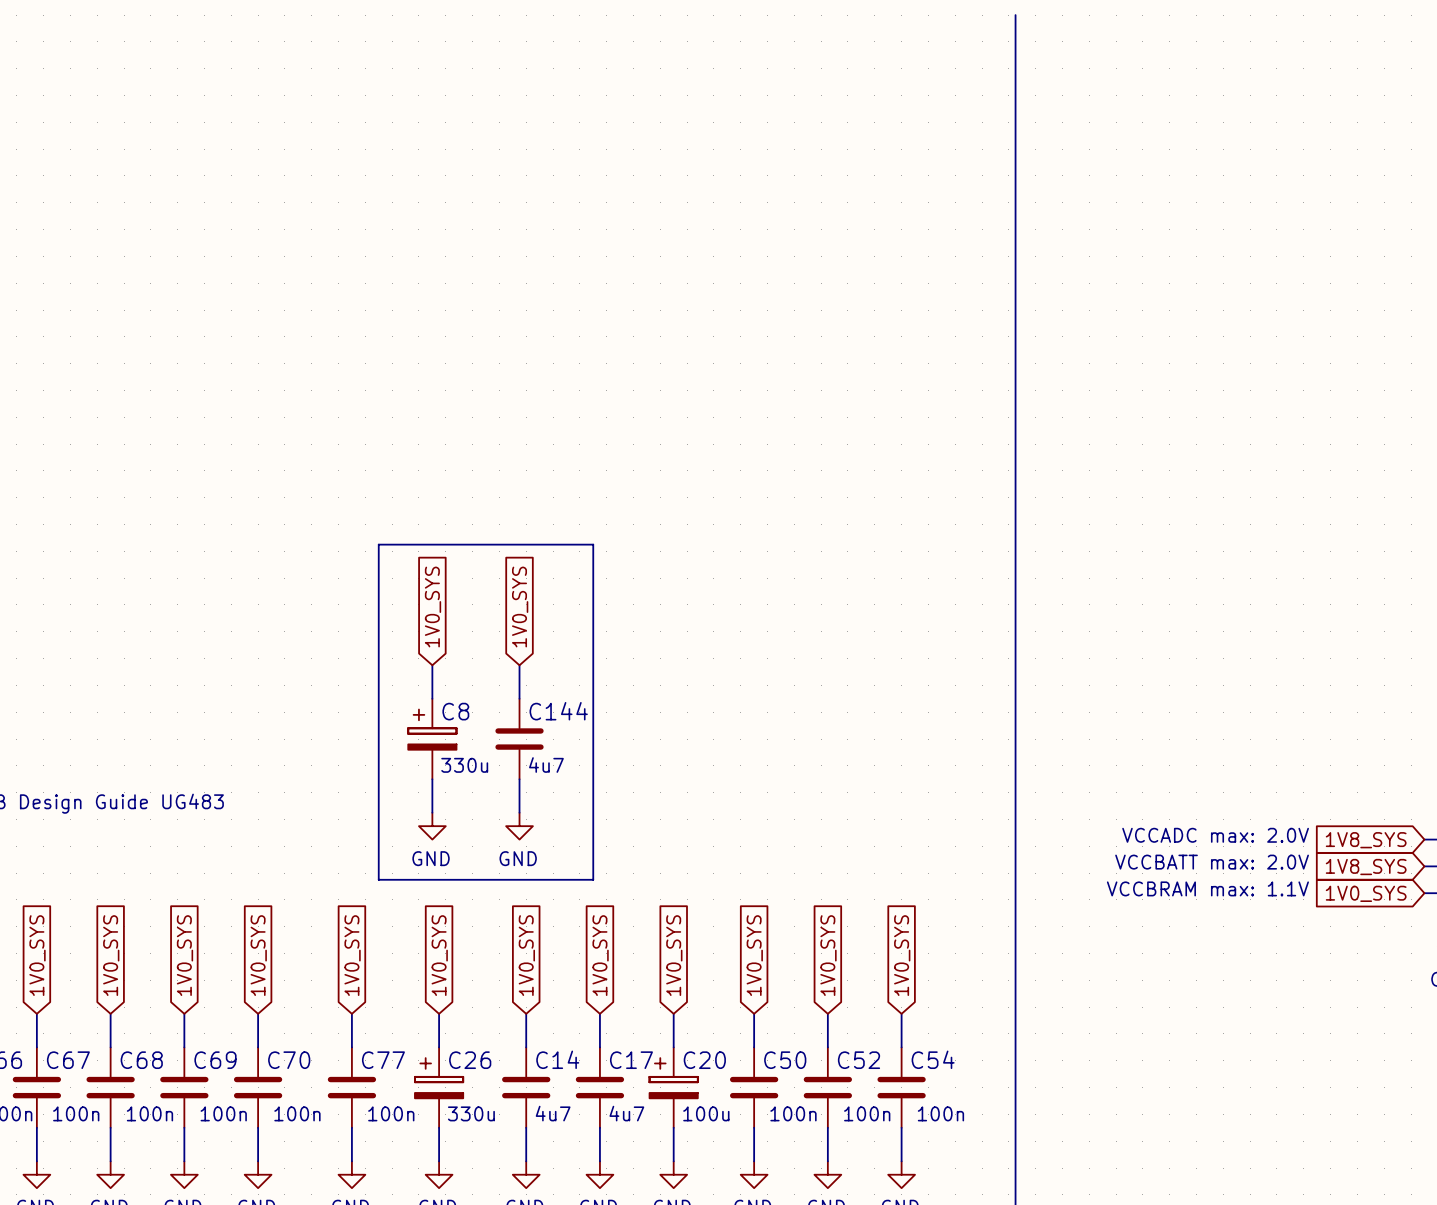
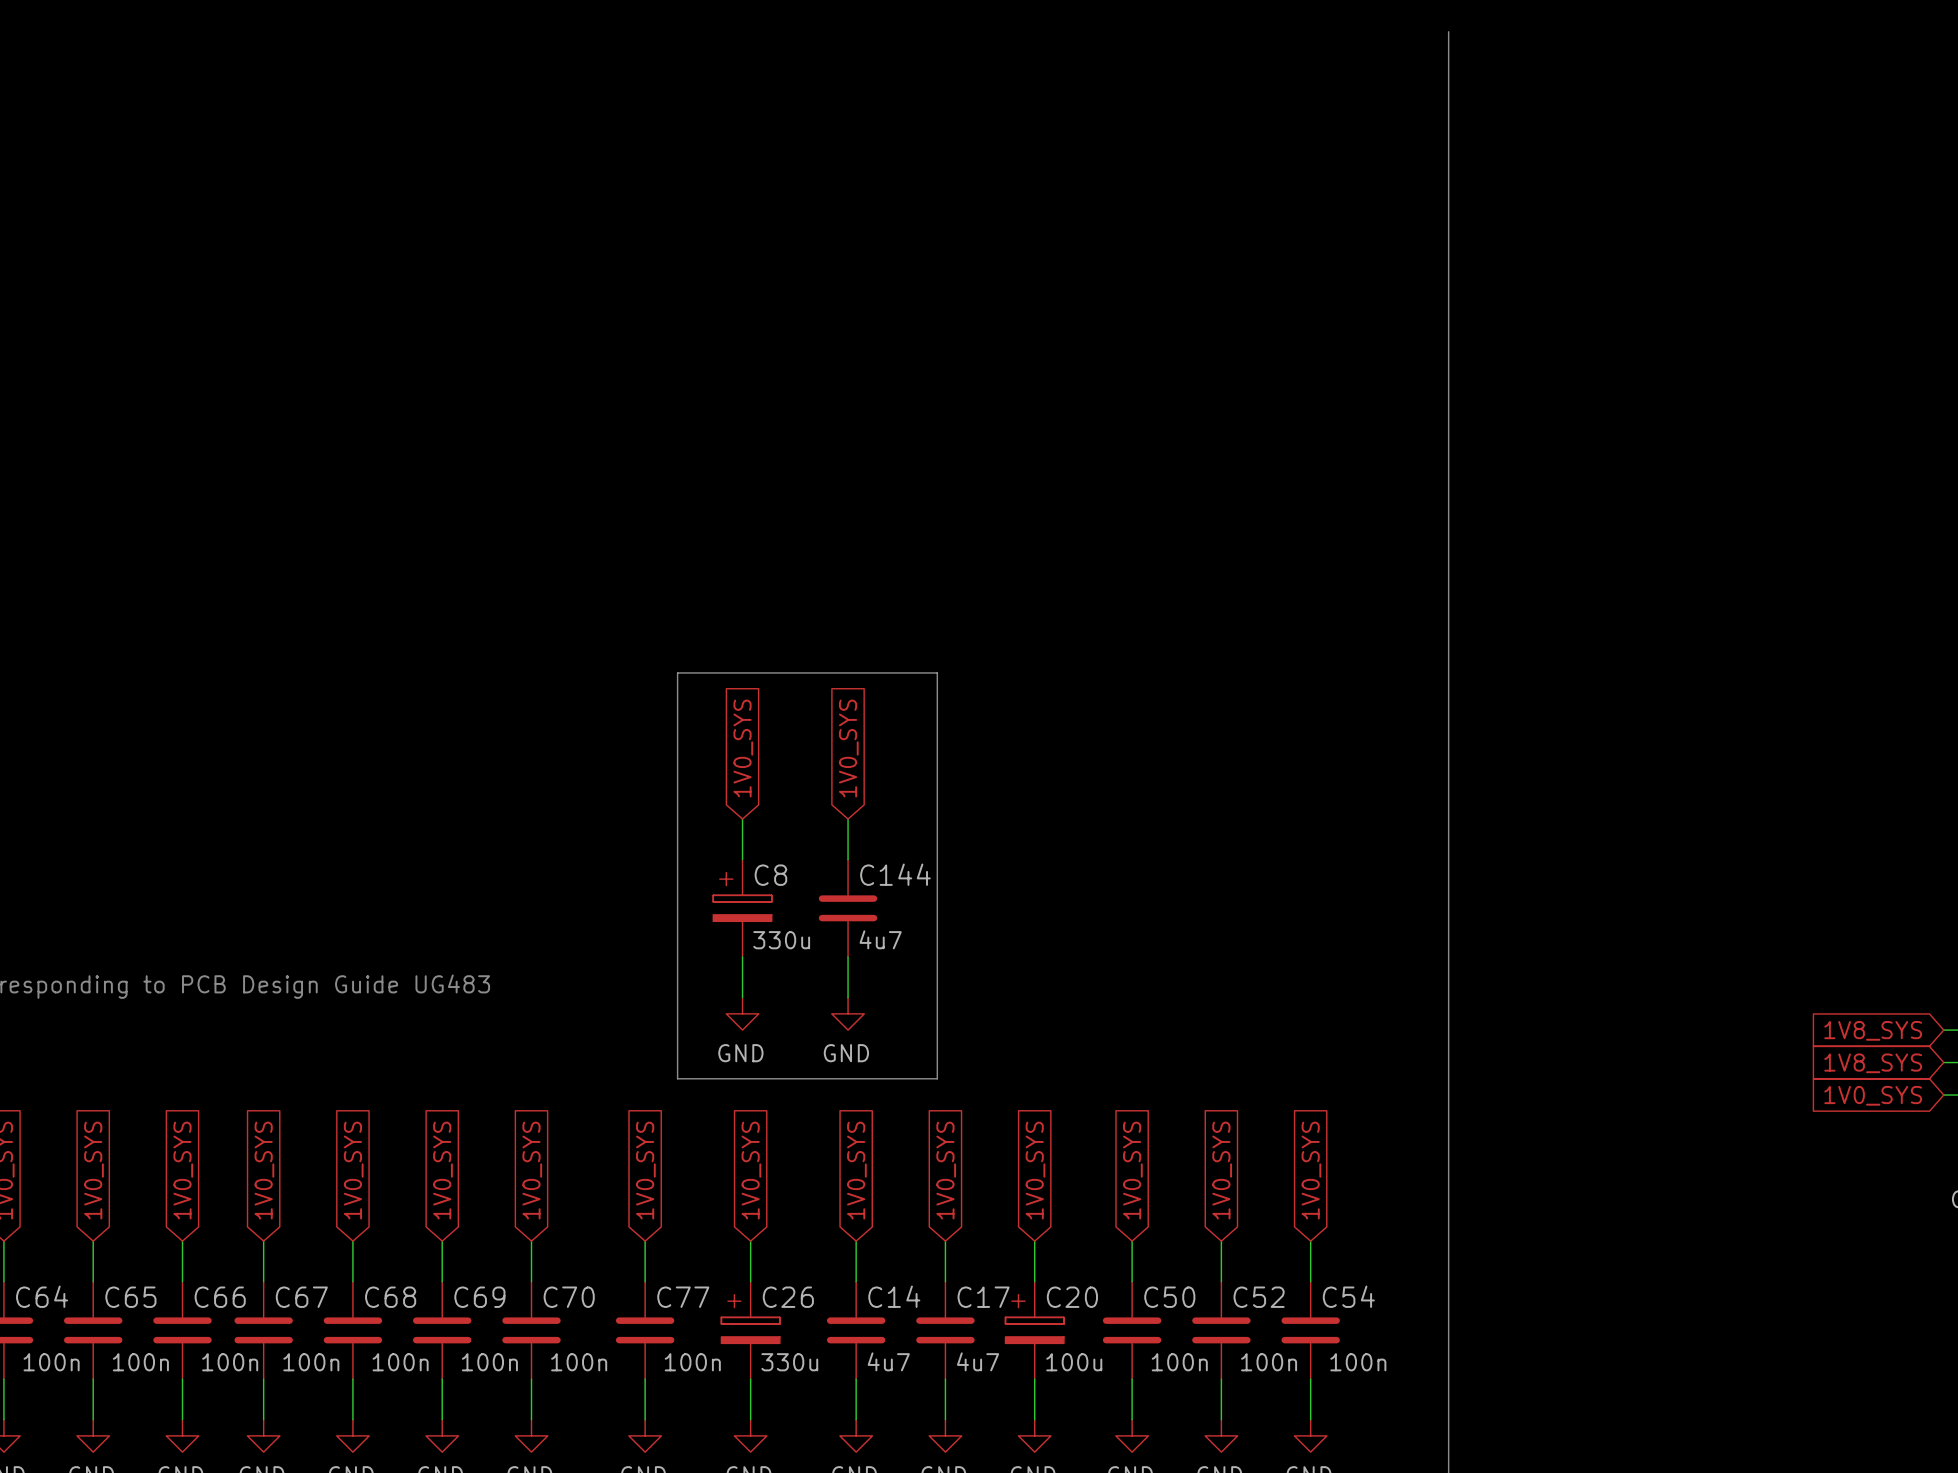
text: VCCADC max: 2.0V (1215, 835) -> none
text: VCCBATT max: 2.0V (1212, 862) -> none
text: VCCBRAM max: 1.1V (1207, 888) -> none

